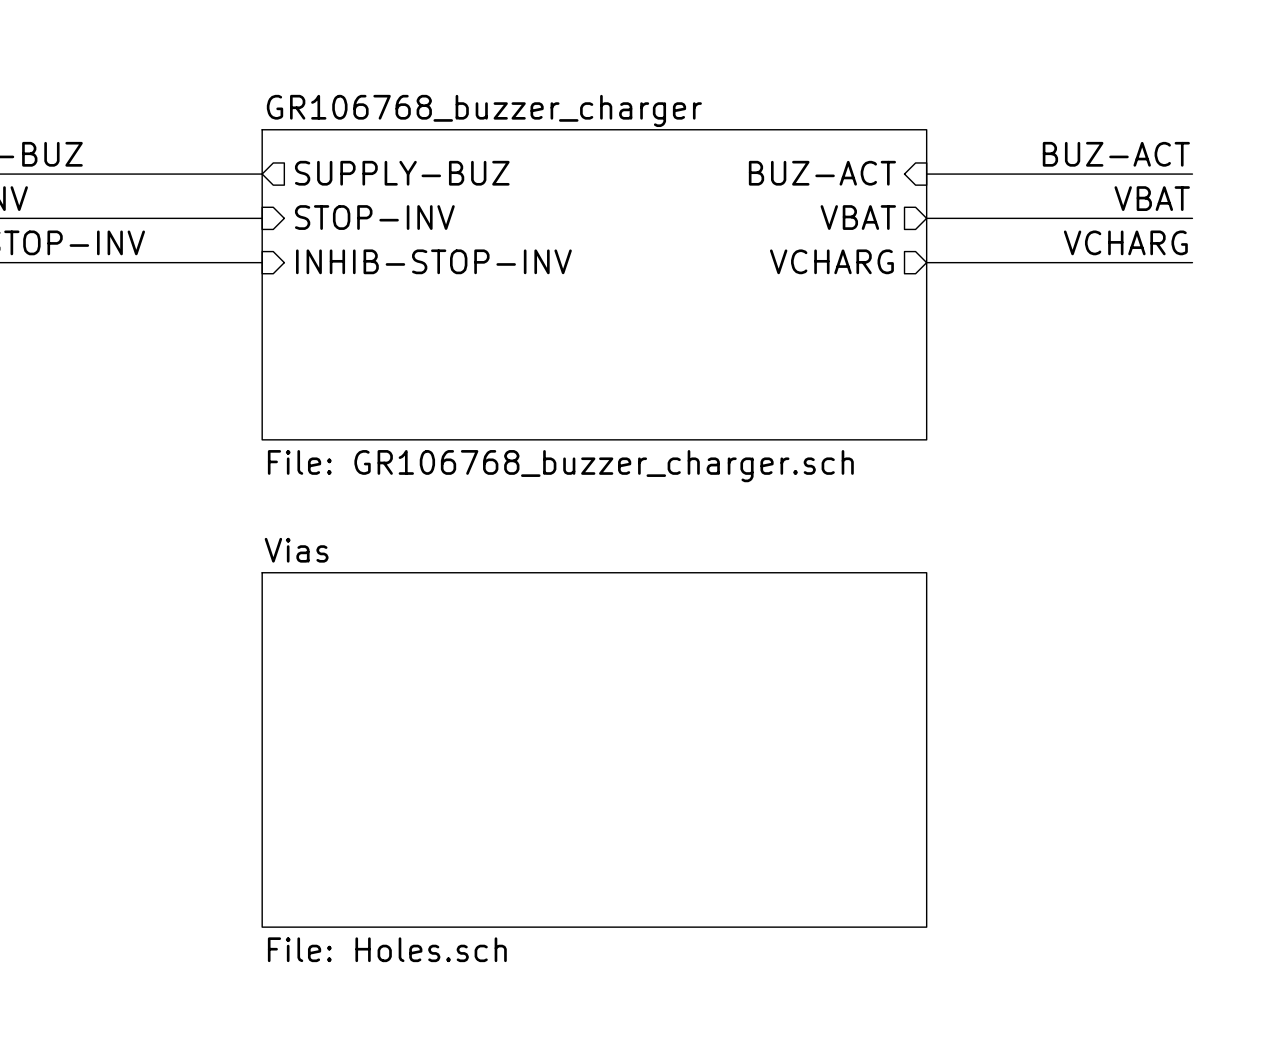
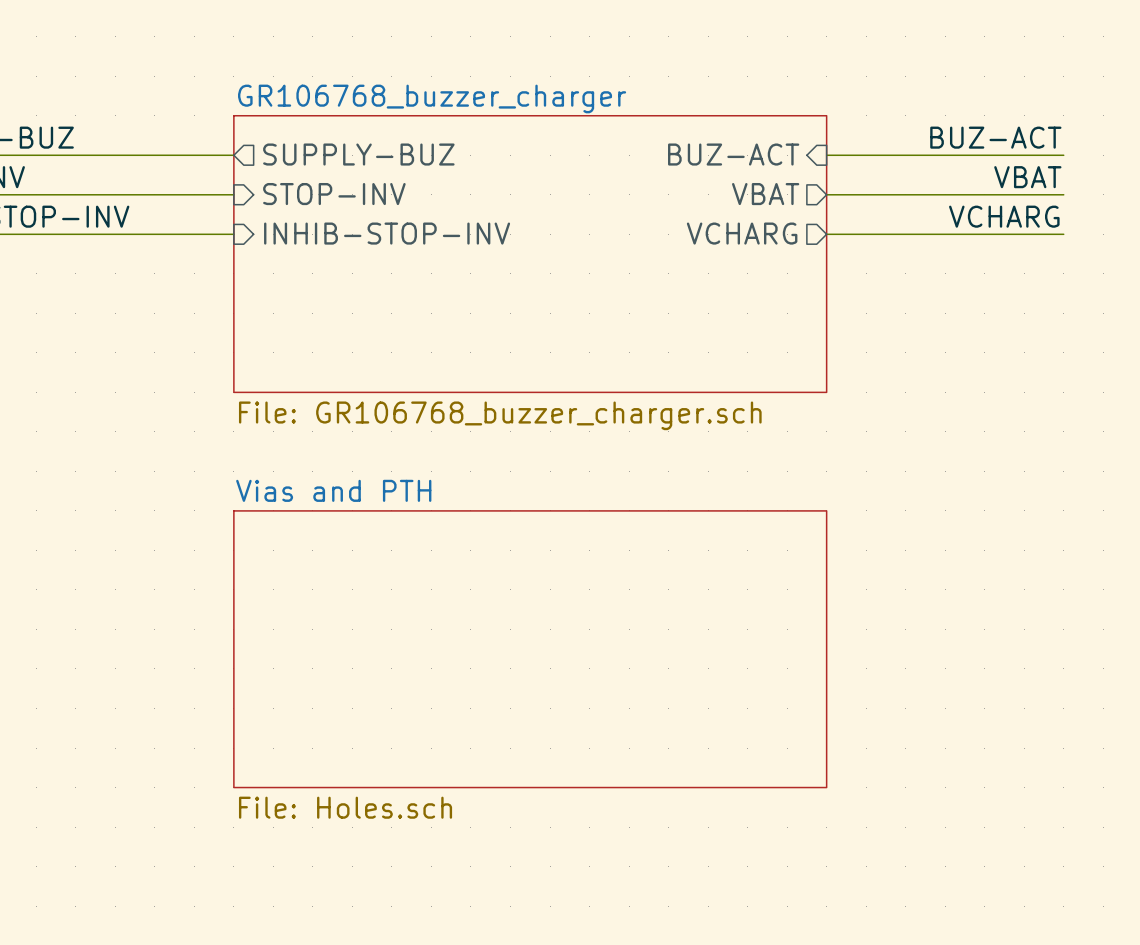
sheet Vias and PTH: none -> File: Holes.sch (530, 649)
sheet Vias: File: Holes.sch (594, 749) -> none

